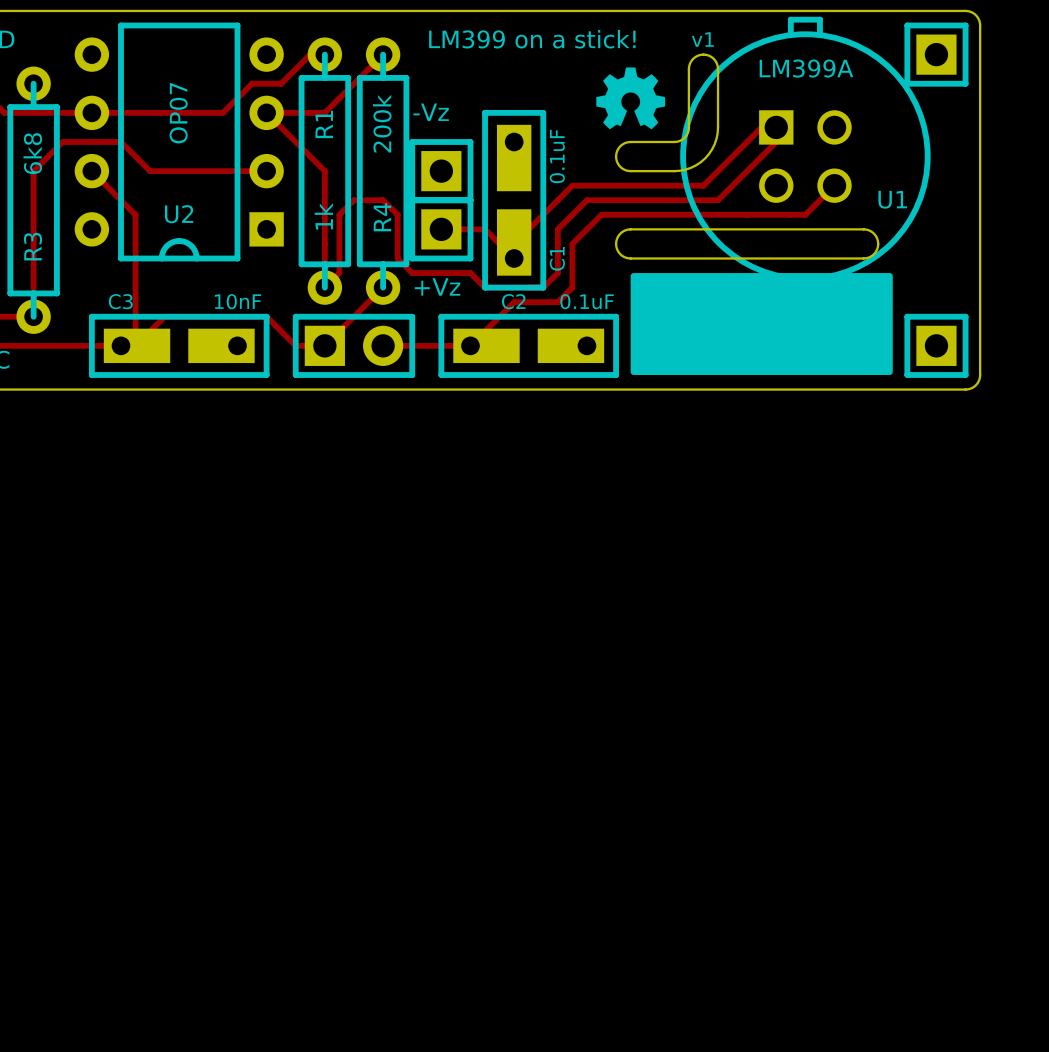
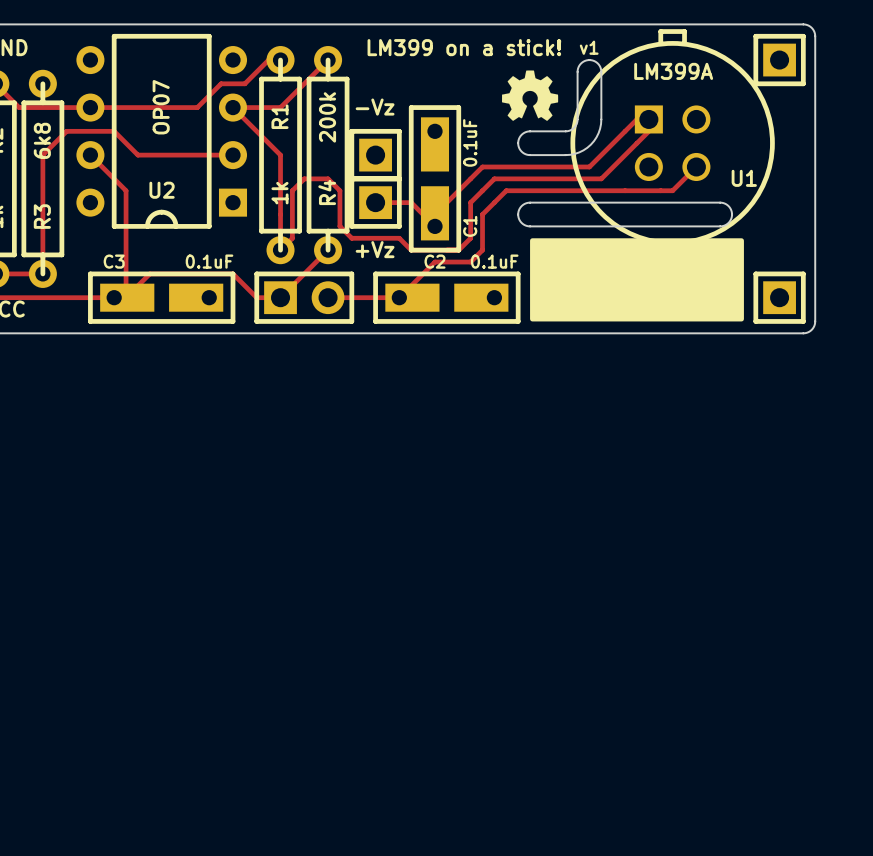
C3 value: 10nF (238, 301) -> 0.1uF (209, 261)

